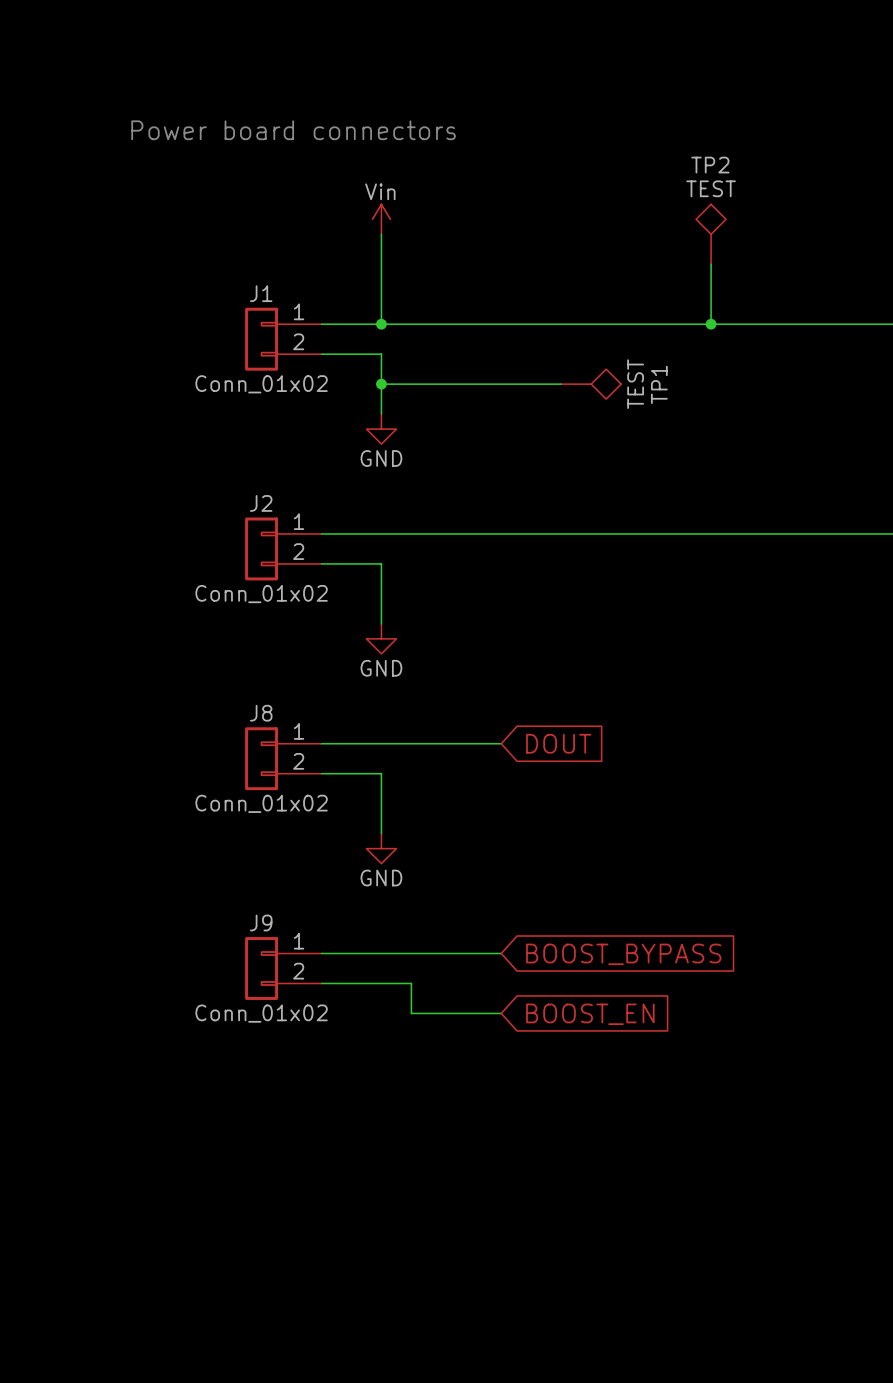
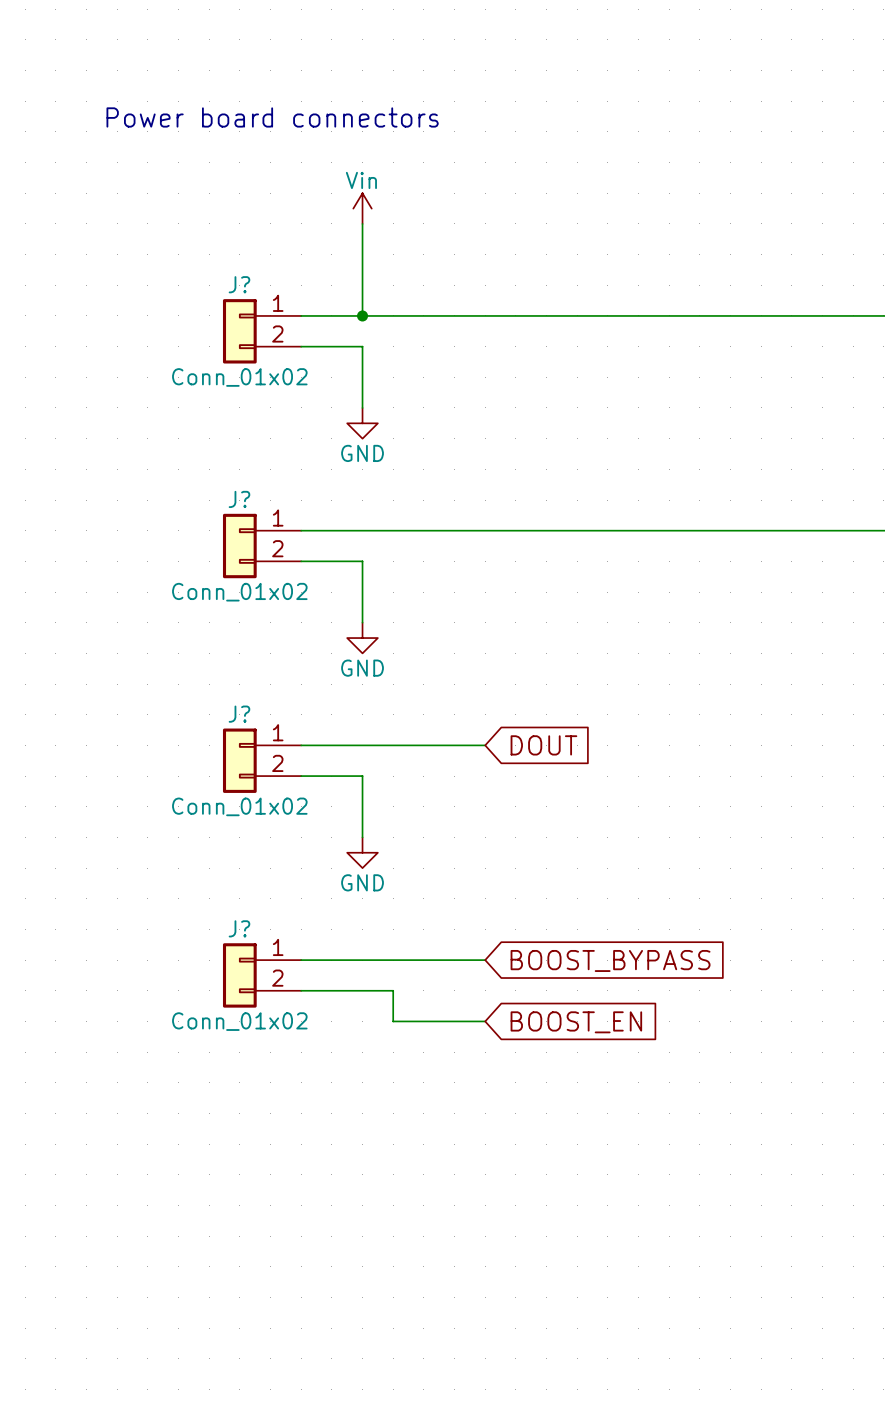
TP2: TEST (711, 234) -> none
wire: (711, 264) (711, 324) -> none
J1 name: J1 (261, 293) -> J? (239, 284)
junction: (711, 324) -> none
wire: (381, 384) (561, 384) -> none
junction: (381, 384) -> none
TP1: TEST (591, 384) -> none
J2 name: J2 (261, 503) -> J? (239, 499)
J8 name: J8 (261, 713) -> J? (239, 714)
J9 name: J9 (261, 922) -> J? (239, 928)

